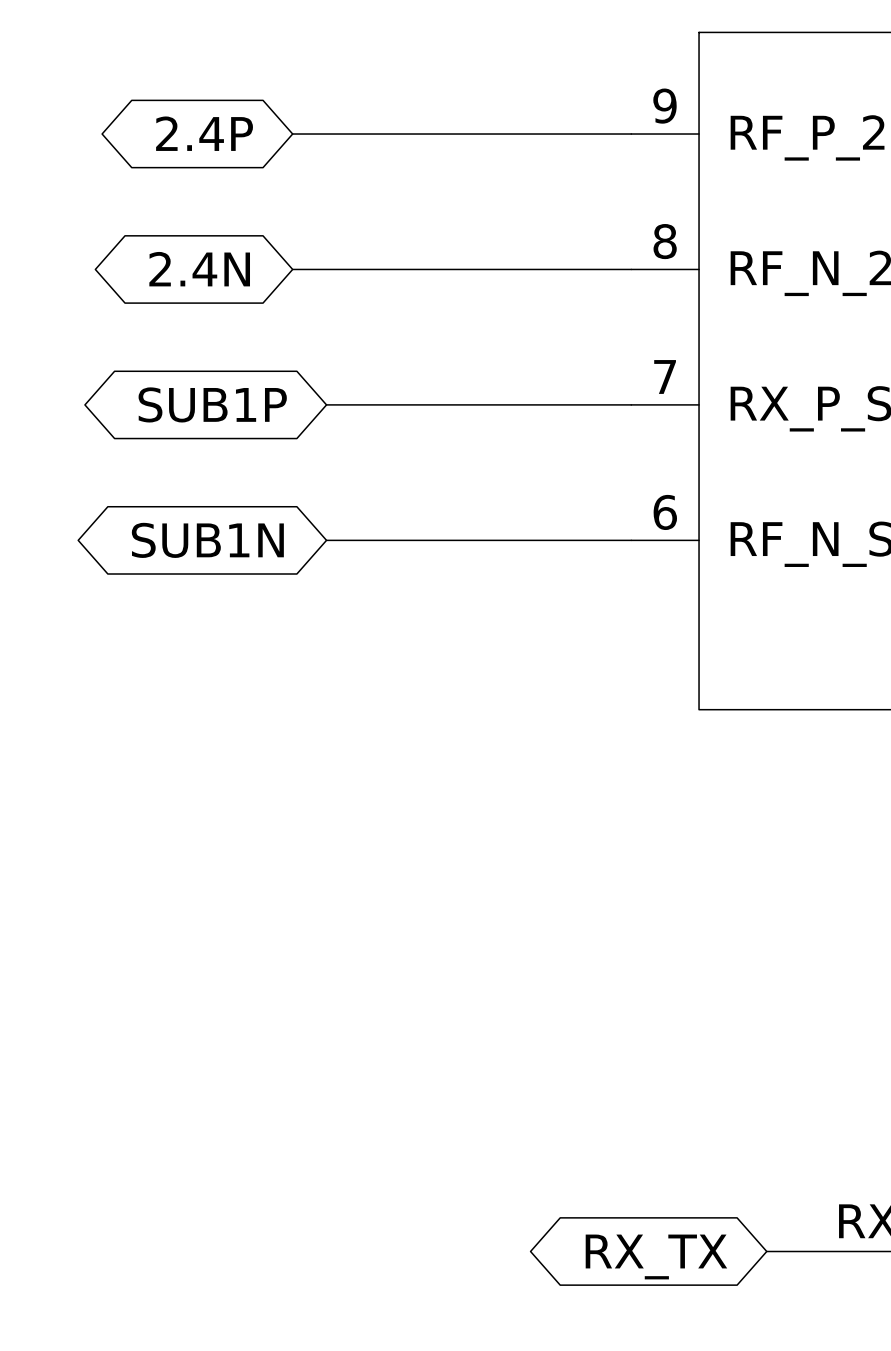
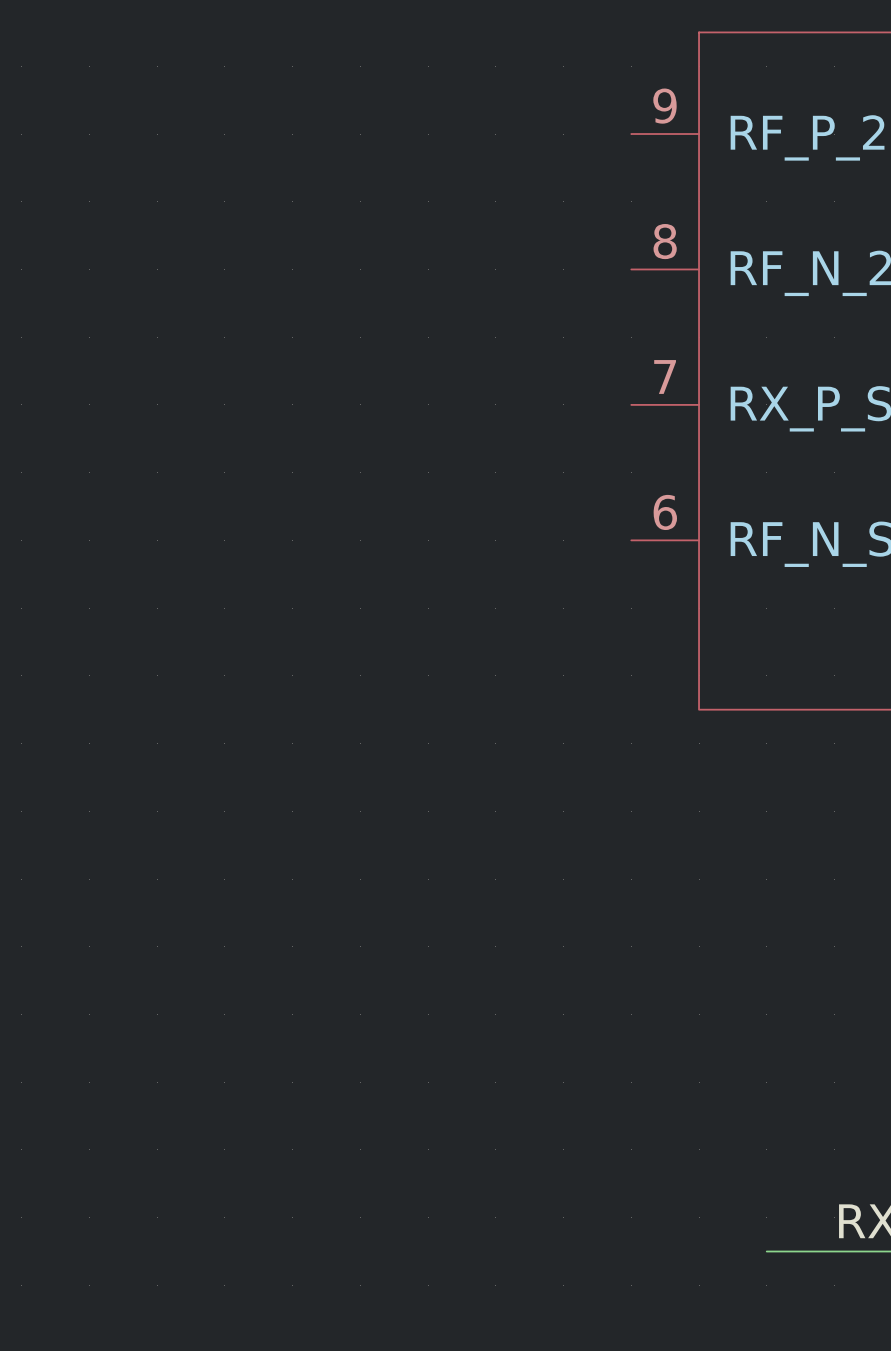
global label: 2.4P (204, 133) -> none
wire: (292, 134) (631, 134) -> none
global label: 2.4N (199, 269) -> none
wire: (292, 269) (631, 269) -> none
global label: SUB1P (212, 404) -> none
wire: (326, 404) (631, 404) -> none
global label: SUB1N (207, 540) -> none
wire: (326, 540) (631, 540) -> none
global label: RX_TX (656, 1256) -> none

